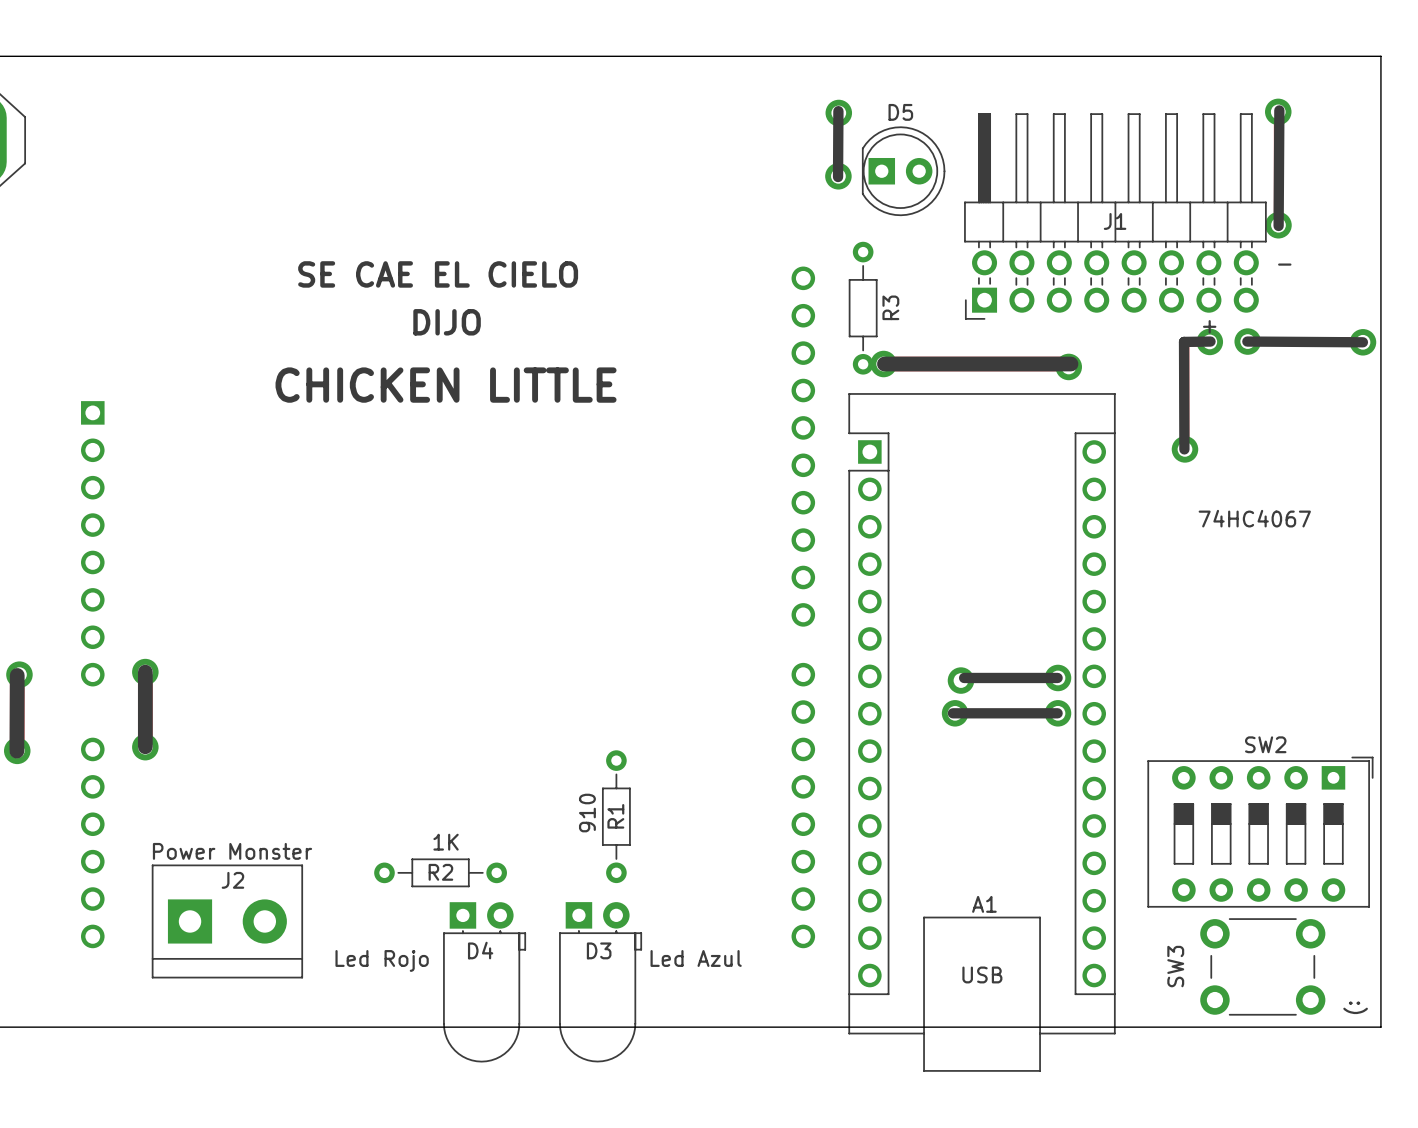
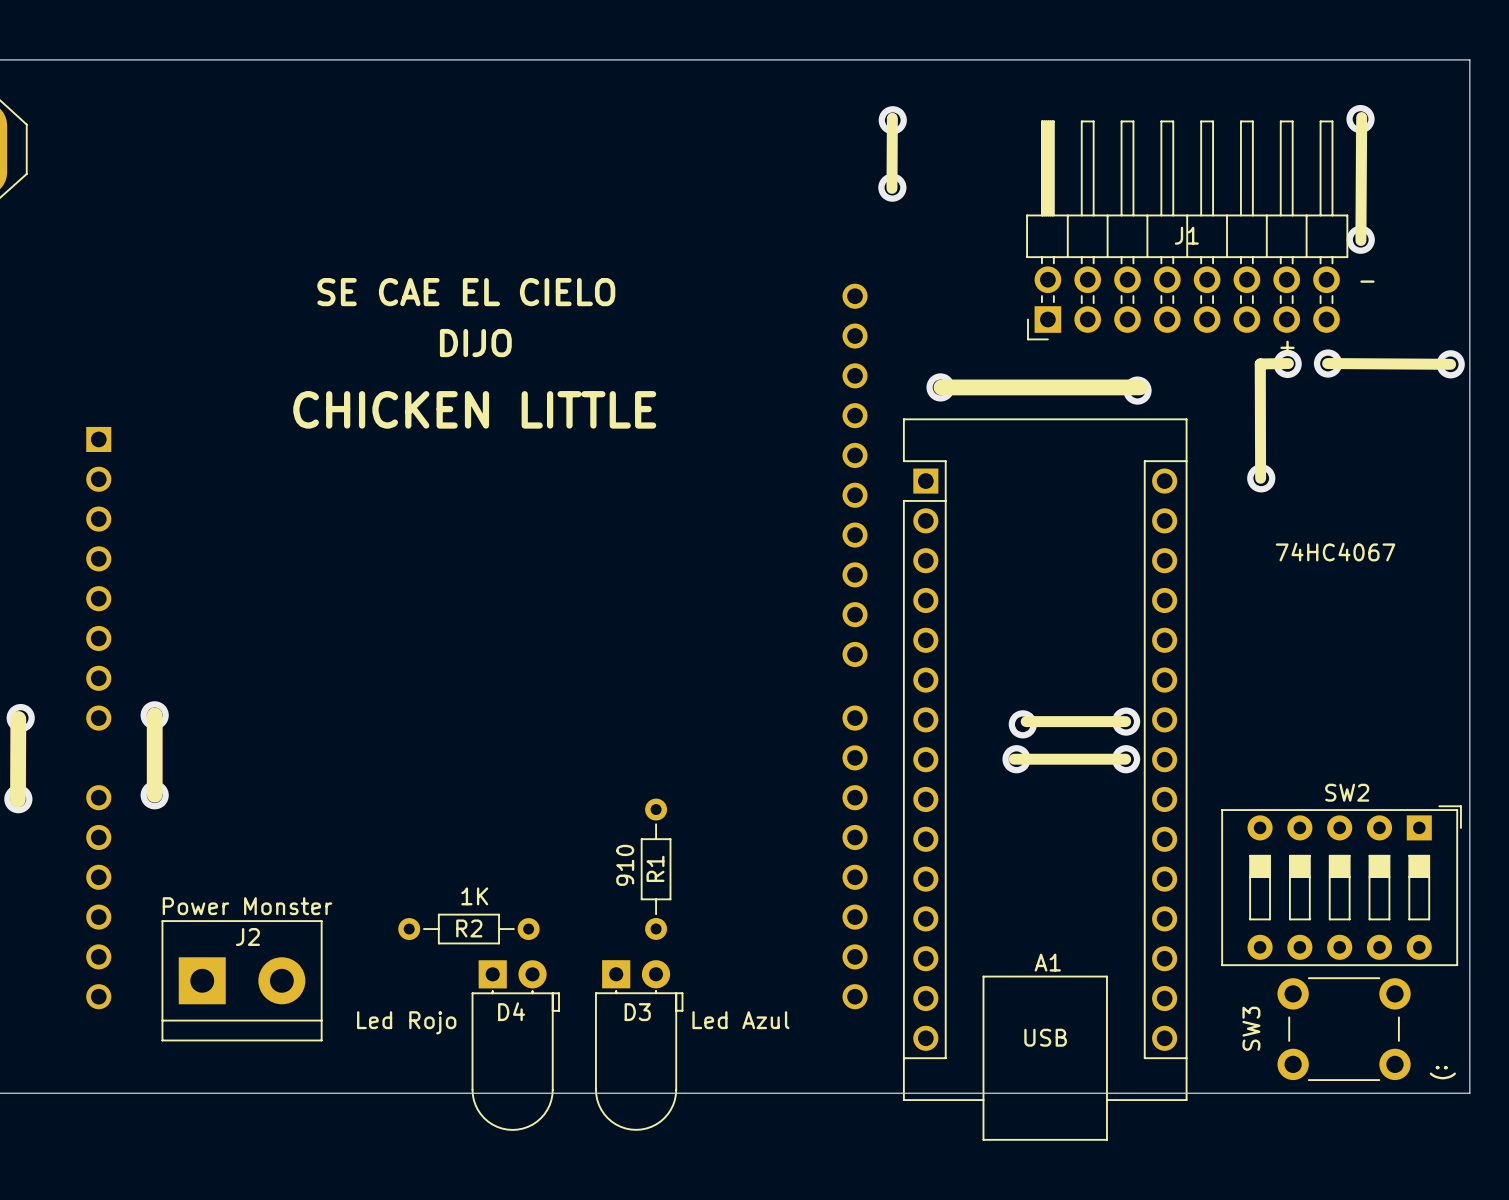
D5: (903, 171) -> none
R3: (863, 308) -> none

